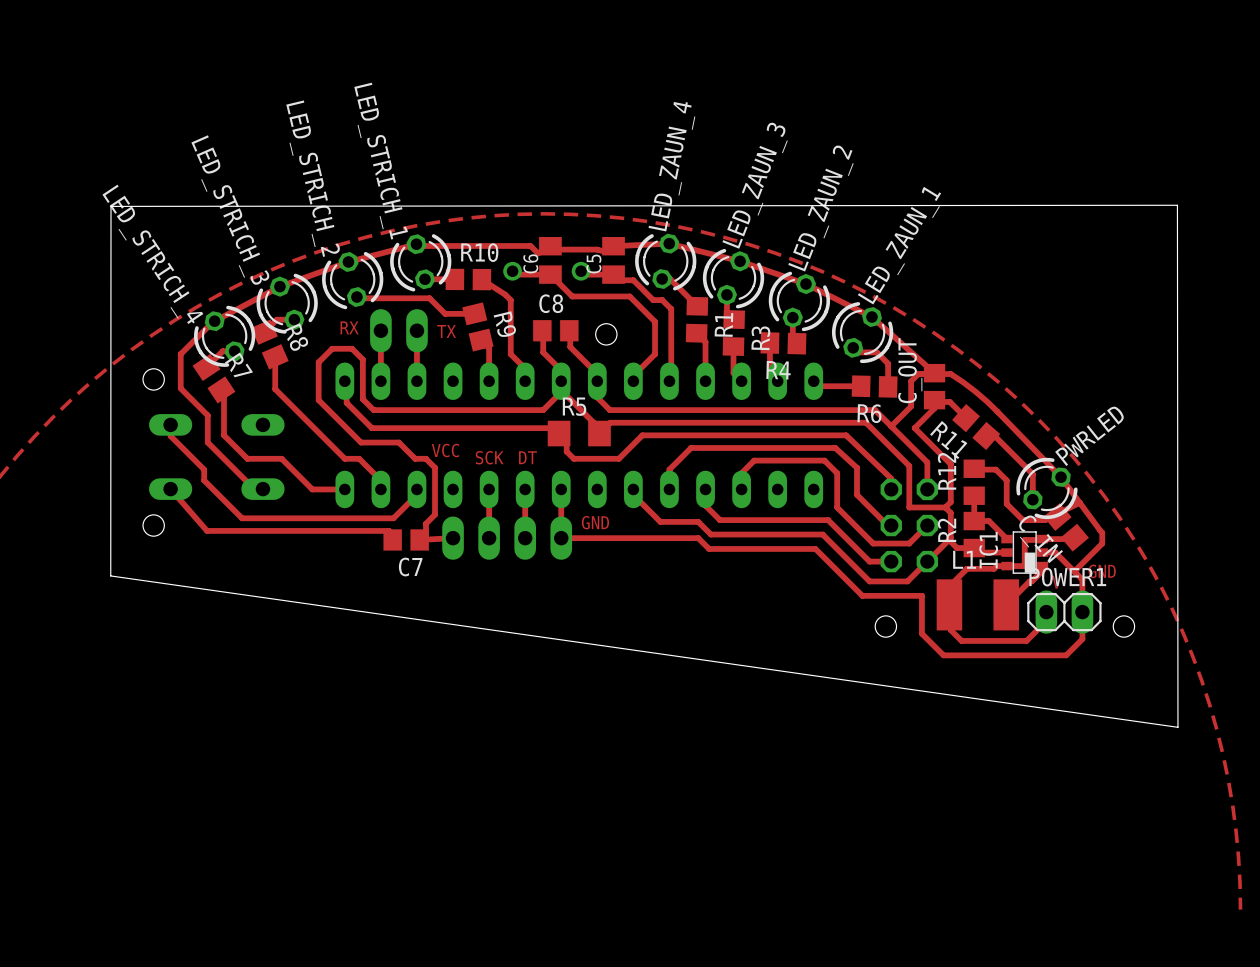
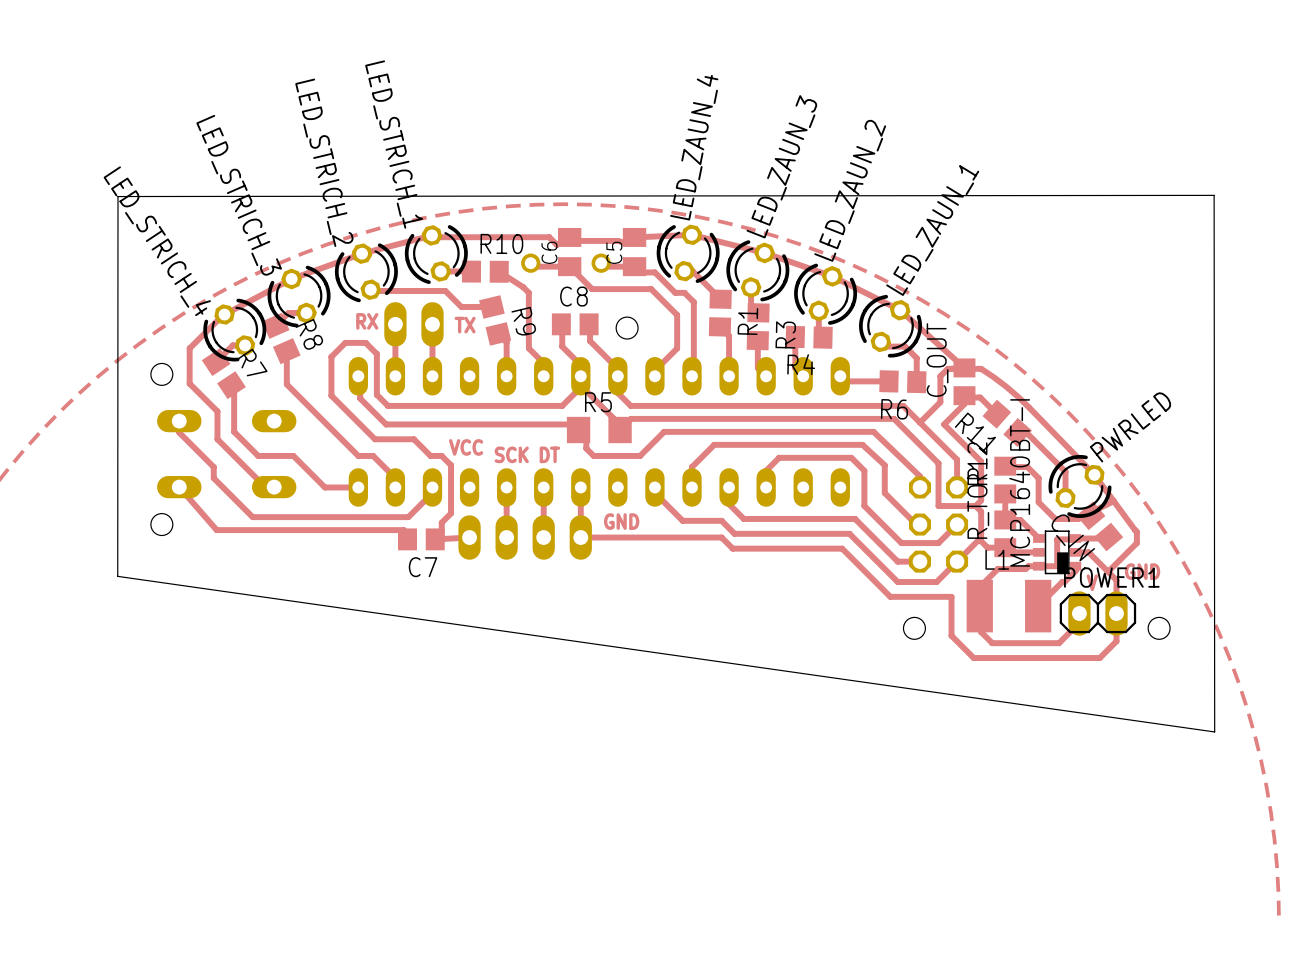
R2 name: R2 (947, 530) -> R_TOP (978, 503)
IC1 name: IC1 (988, 550) -> MCP1640BT-I (1019, 482)

